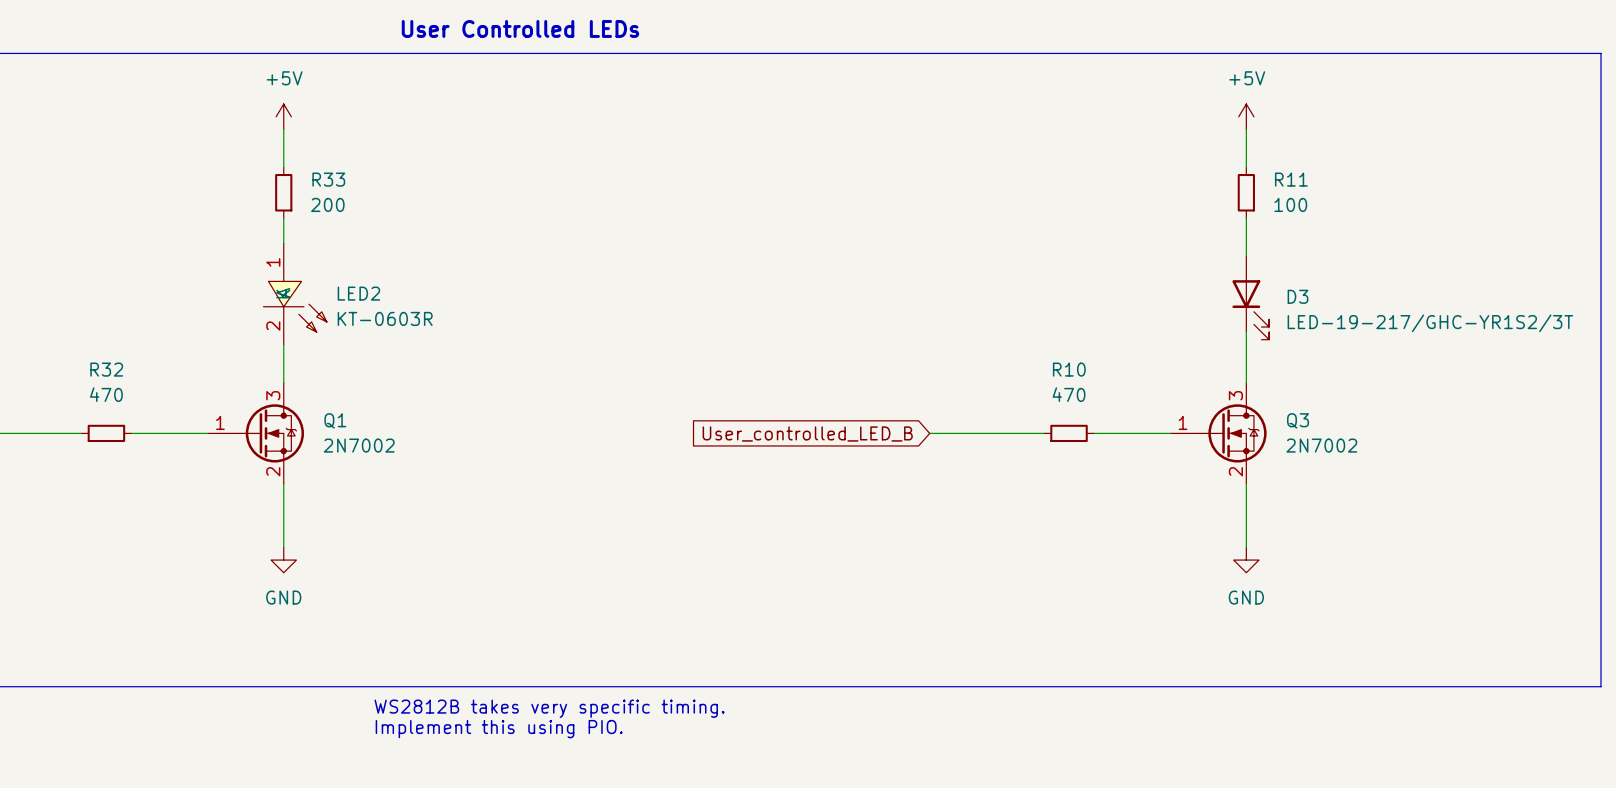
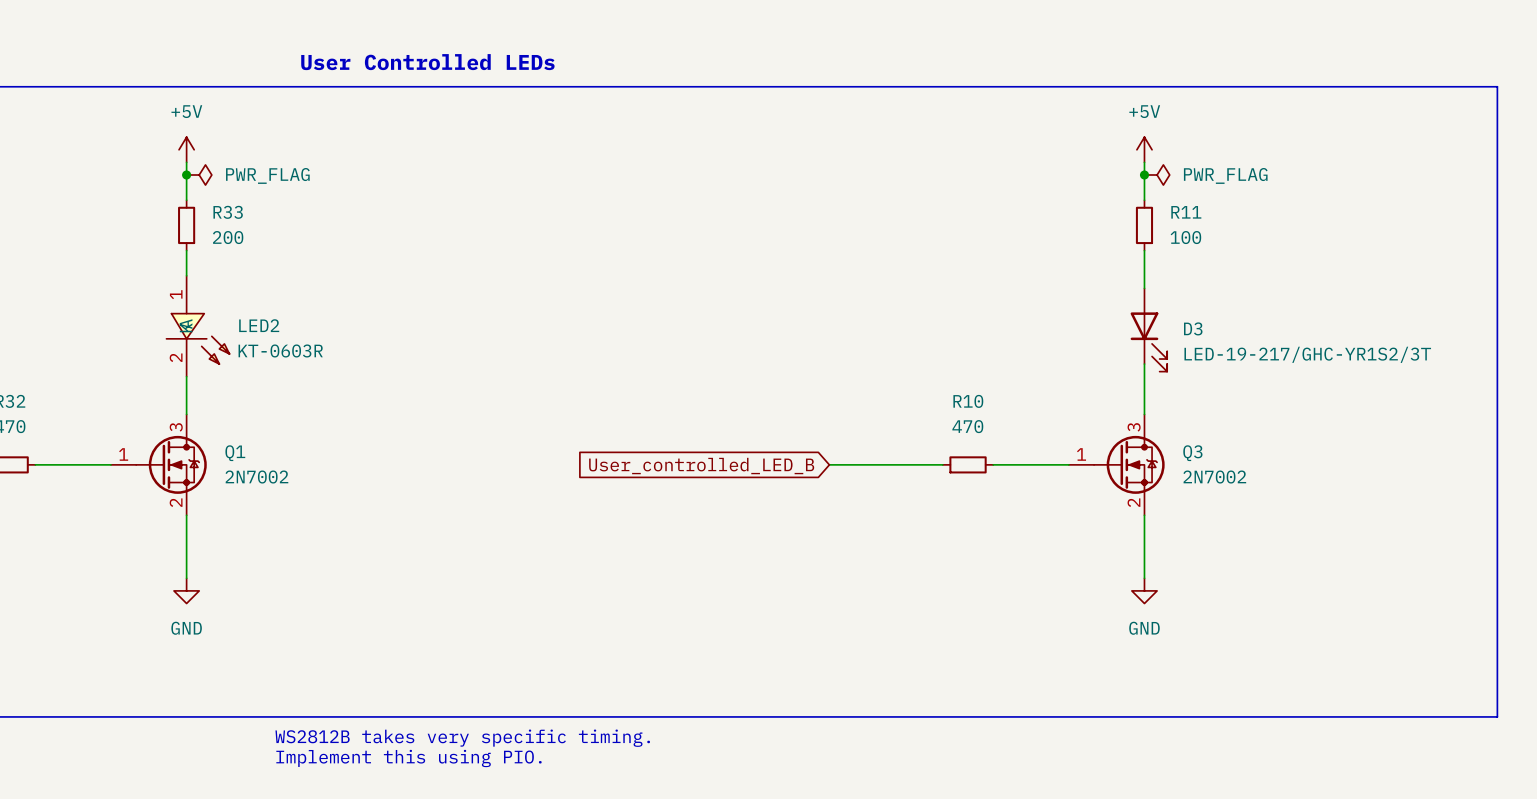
junction: none -> (186, 175)
power symbol: none -> PWR_FLAG (199, 175)
junction: none -> (1144, 175)
power symbol: none -> PWR_FLAG (1157, 175)

